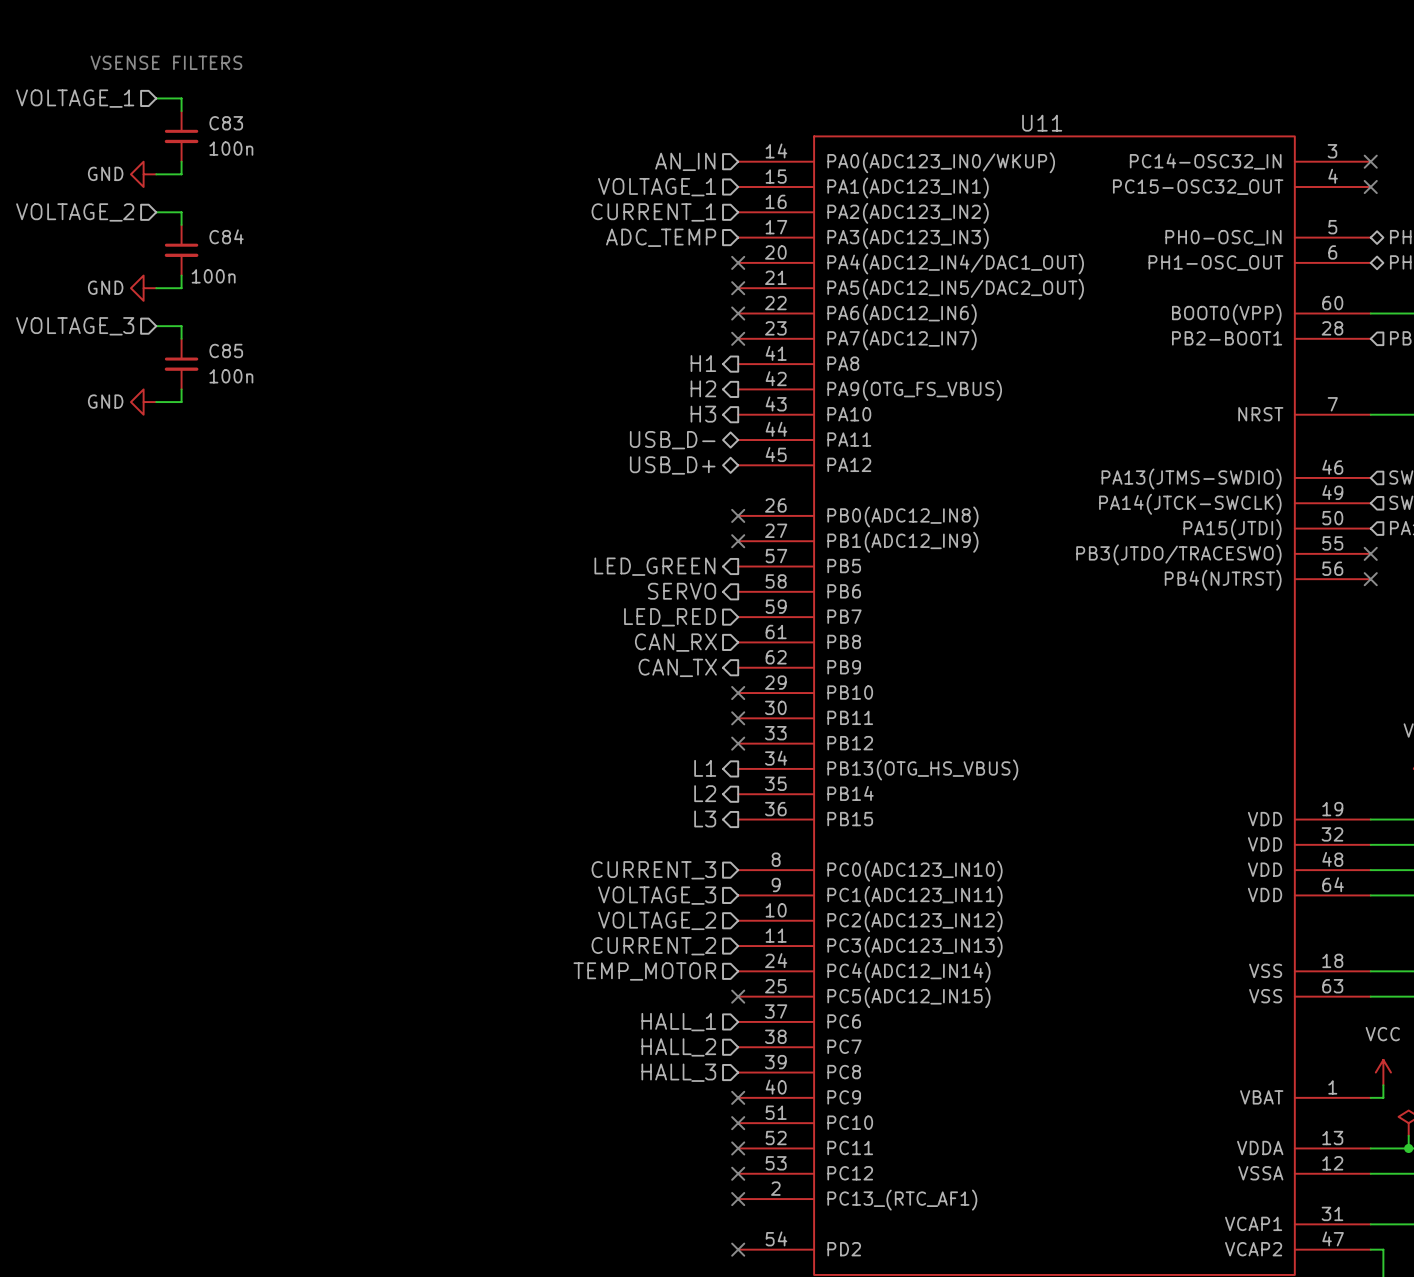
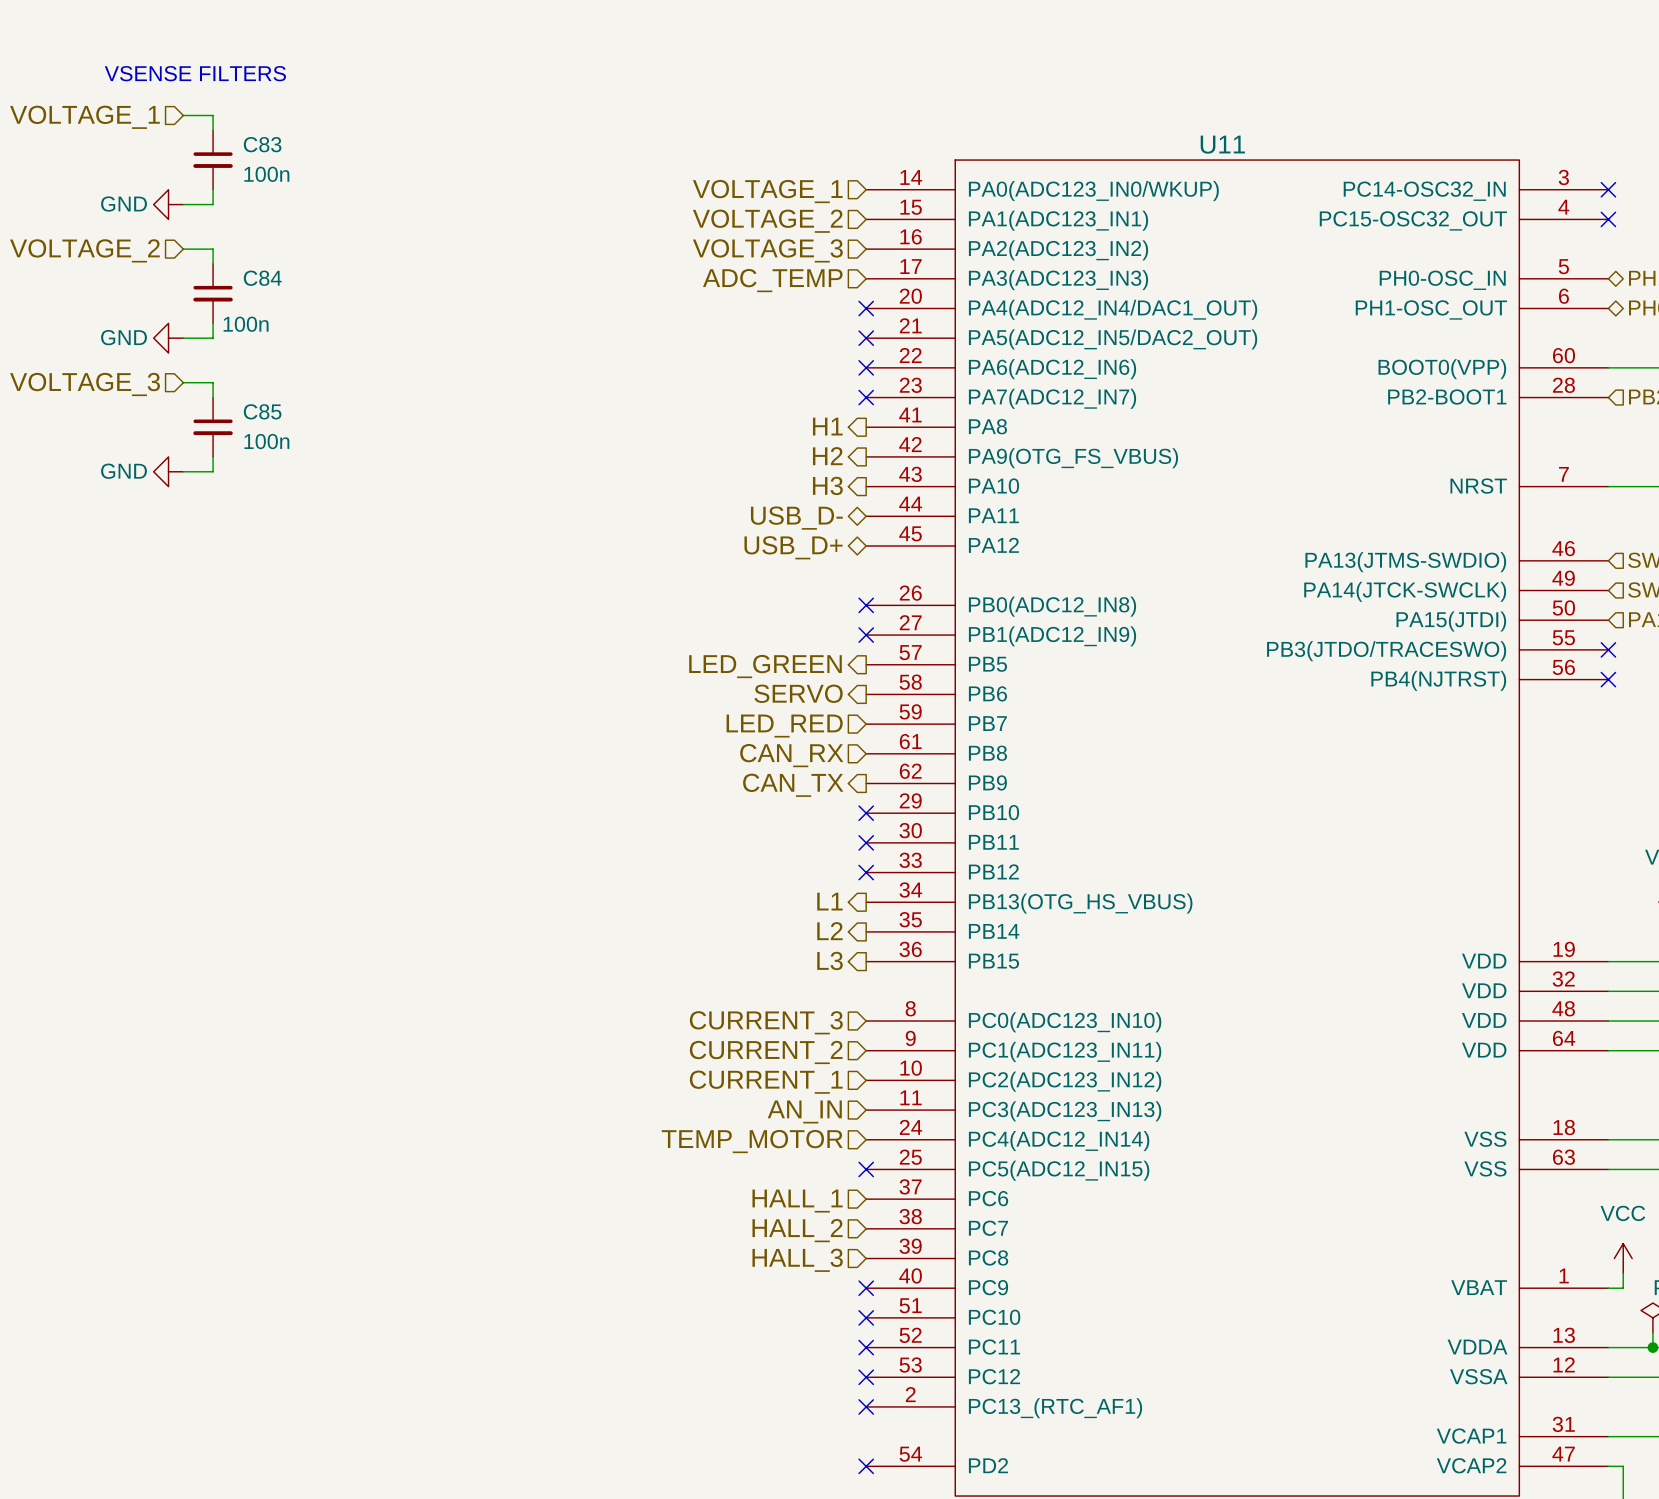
hierarchical label: AN_IN (685, 161) -> VOLTAGE_1 (767, 191)
hierarchical label: VOLTAGE_1 (657, 187) -> VOLTAGE_2 (767, 221)
hierarchical label: CURRENT_1 (653, 212) -> VOLTAGE_3 (767, 250)
hierarchical label: VOLTAGE_3 (657, 895) -> CURRENT_2 (766, 1052)
hierarchical label: VOLTAGE_2 (657, 920) -> CURRENT_1 (766, 1082)
hierarchical label: CURRENT_2 (653, 946) -> AN_IN (804, 1111)

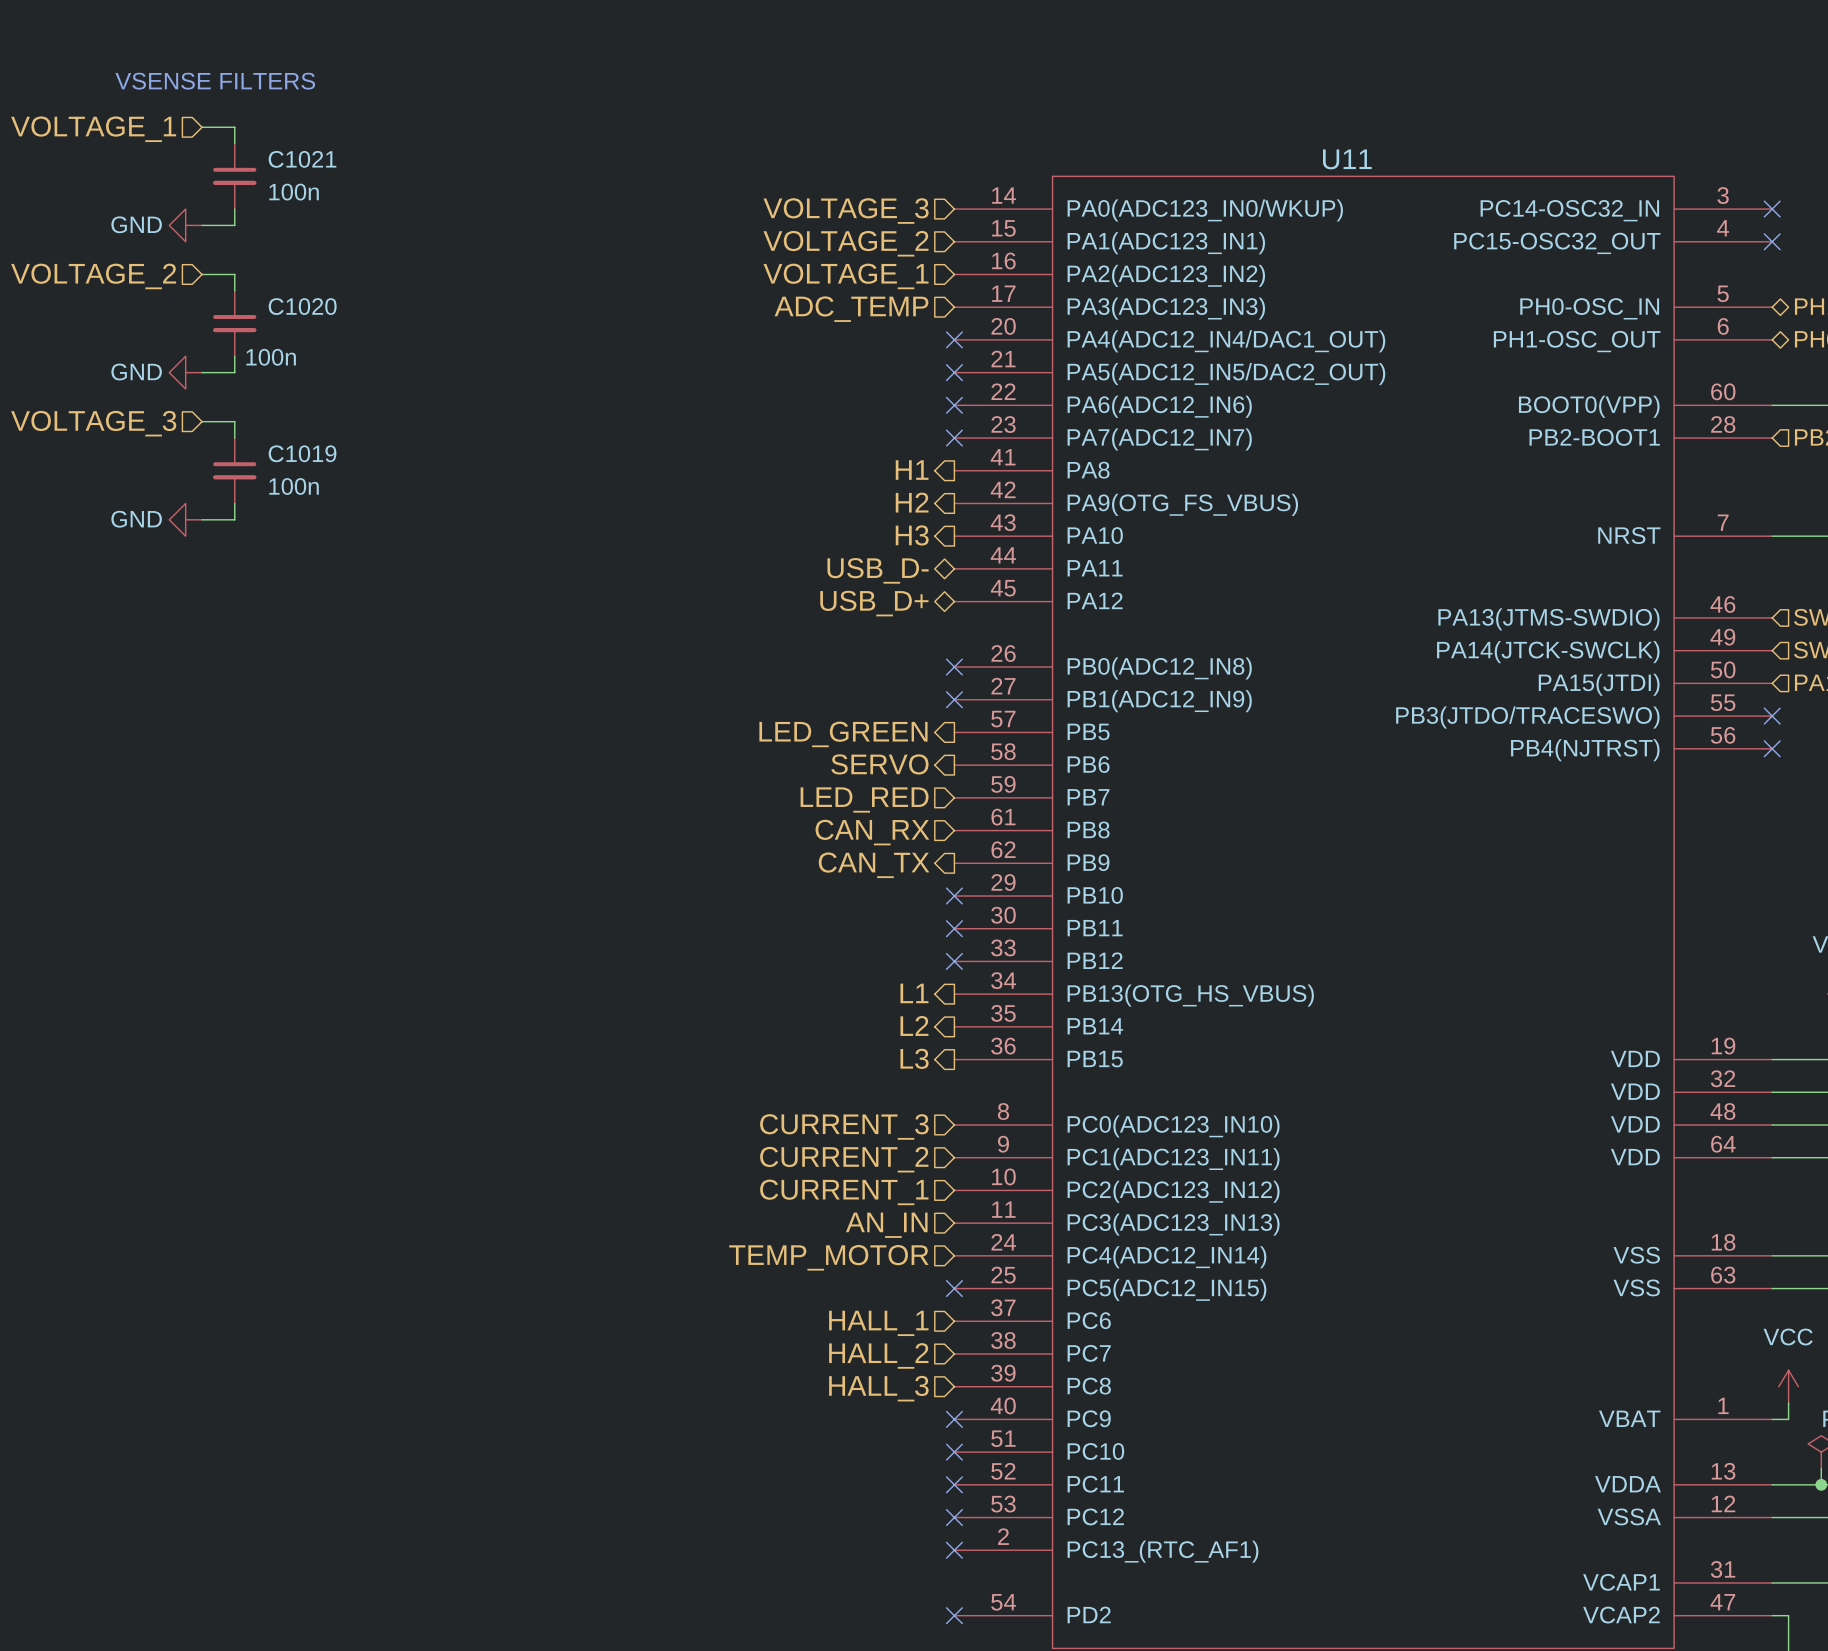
C83 name: C83 (262, 144) -> C1021 (302, 159)
hierarchical label: VOLTAGE_1 (767, 191) -> VOLTAGE_3 (846, 211)
hierarchical label: VOLTAGE_3 (767, 250) -> VOLTAGE_1 (846, 276)
C84 name: C84 (262, 278) -> C1020 (302, 306)
C85 name: C85 (262, 411) -> C1019 (302, 453)

